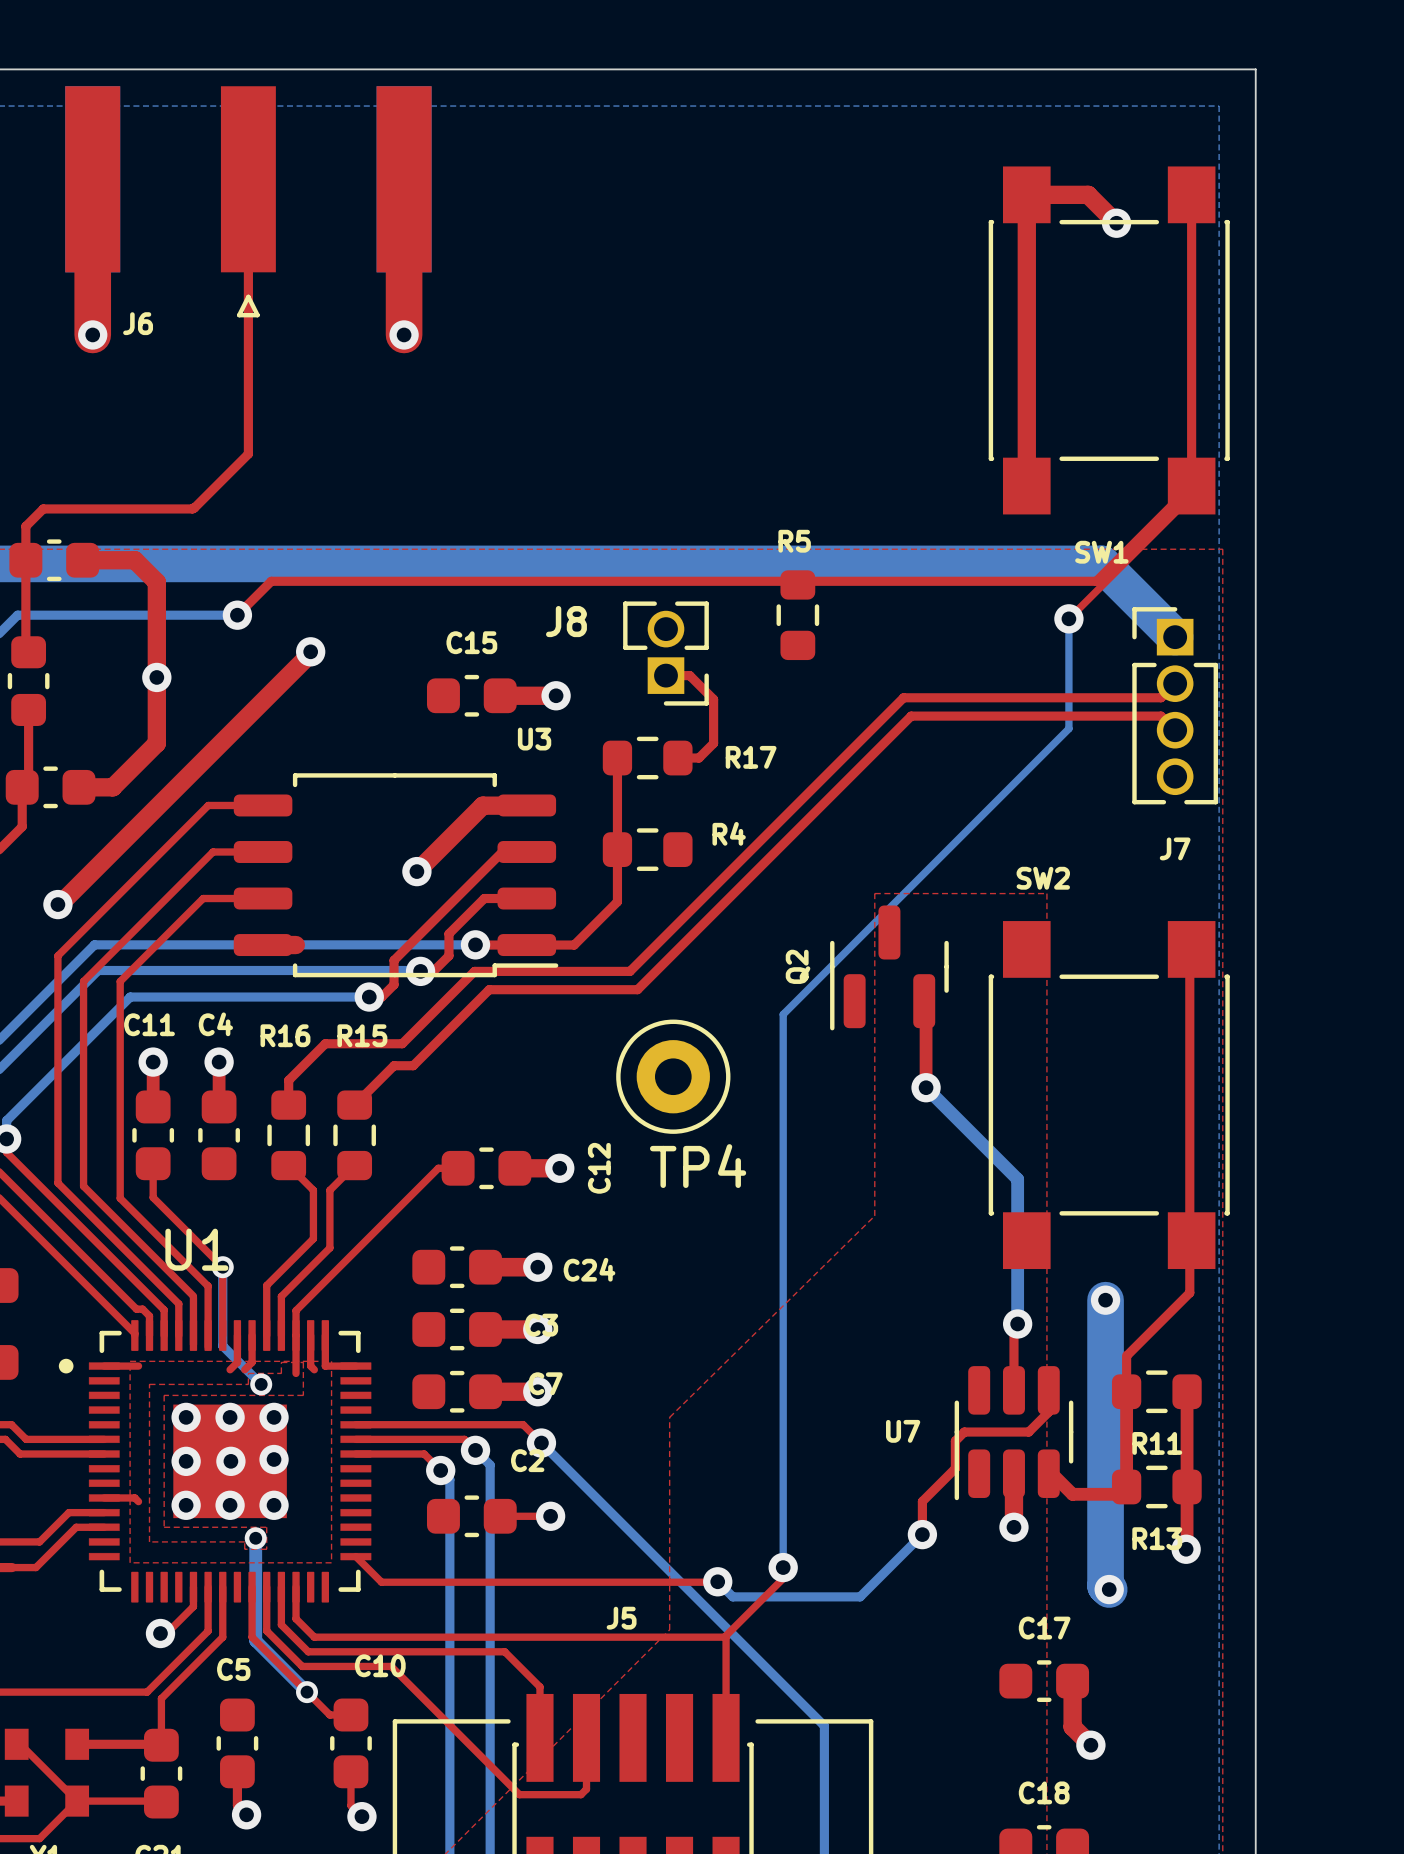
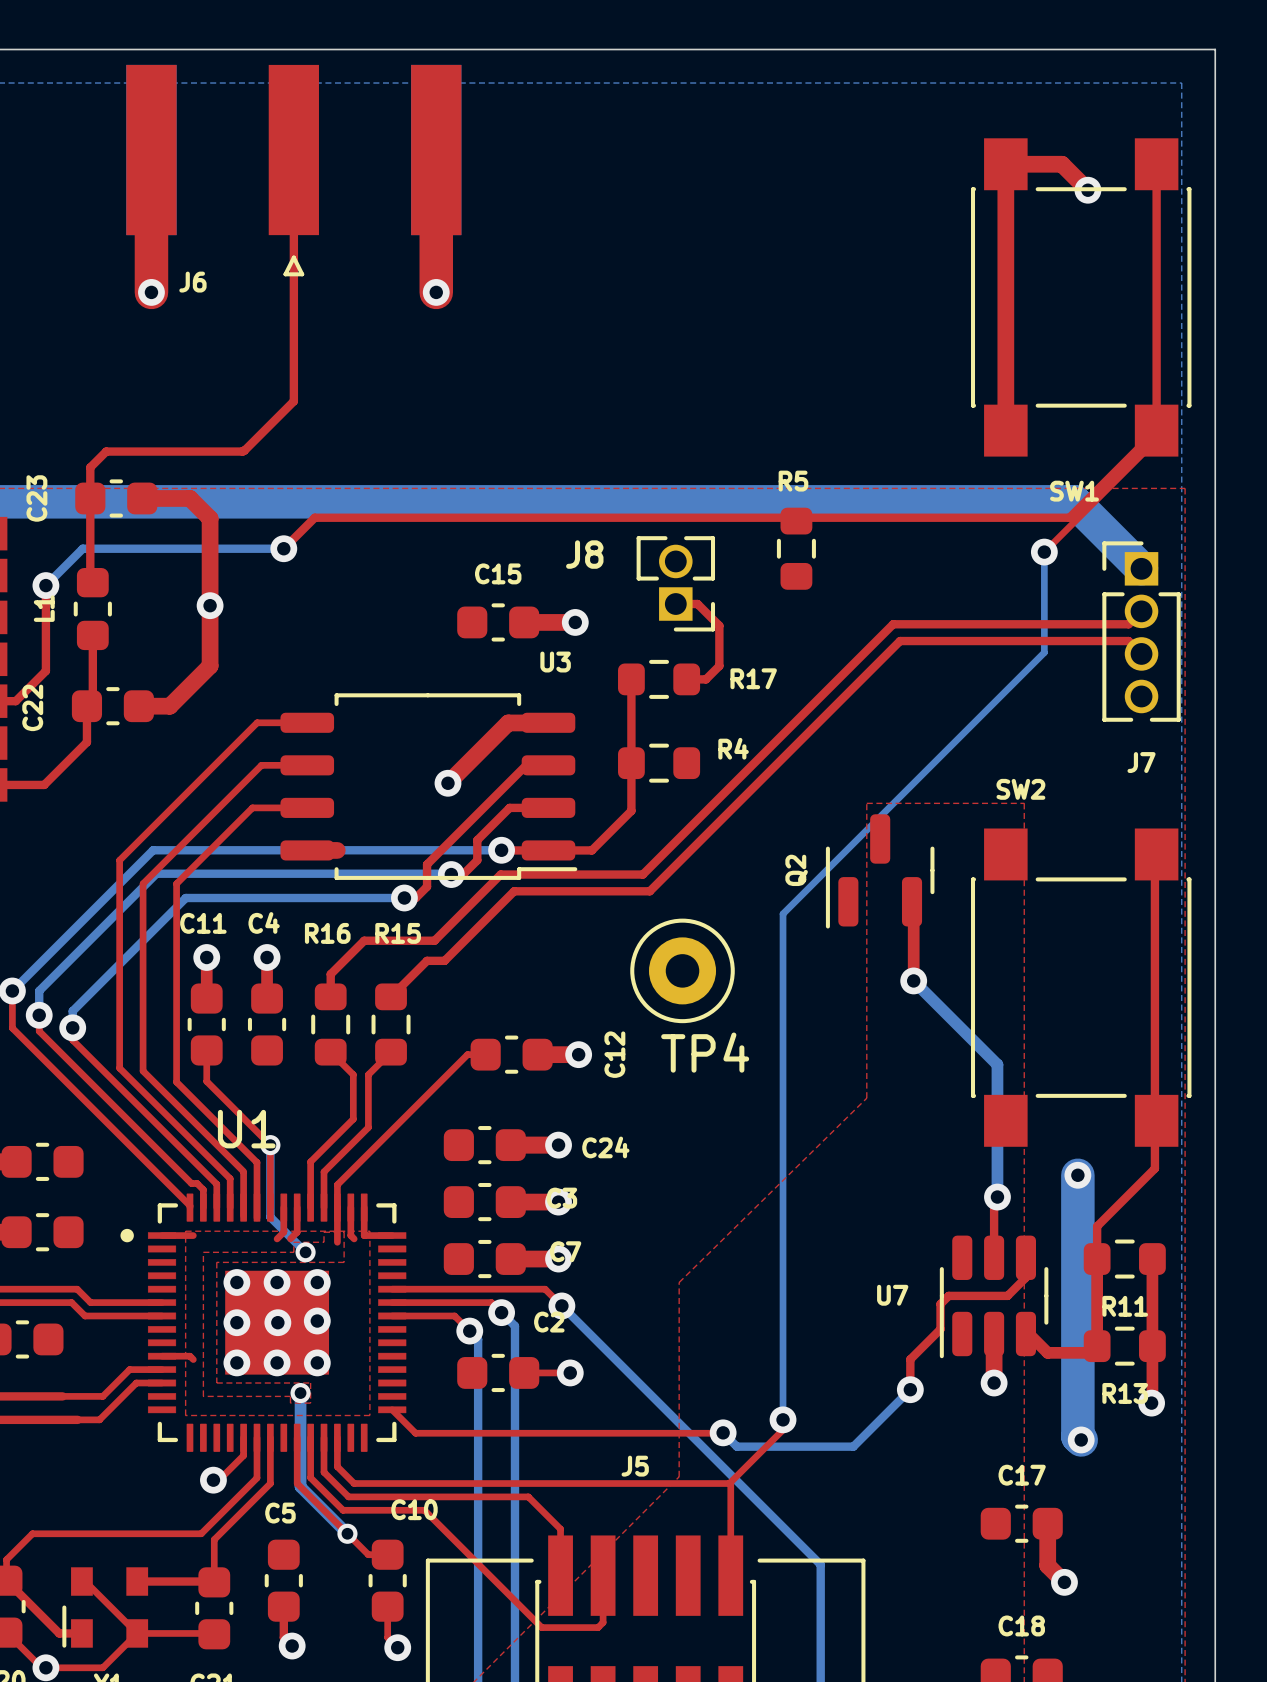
top track: (310, 651) (57, 904) -> none
via: (310, 651) -> none
via: (57, 904) -> none

